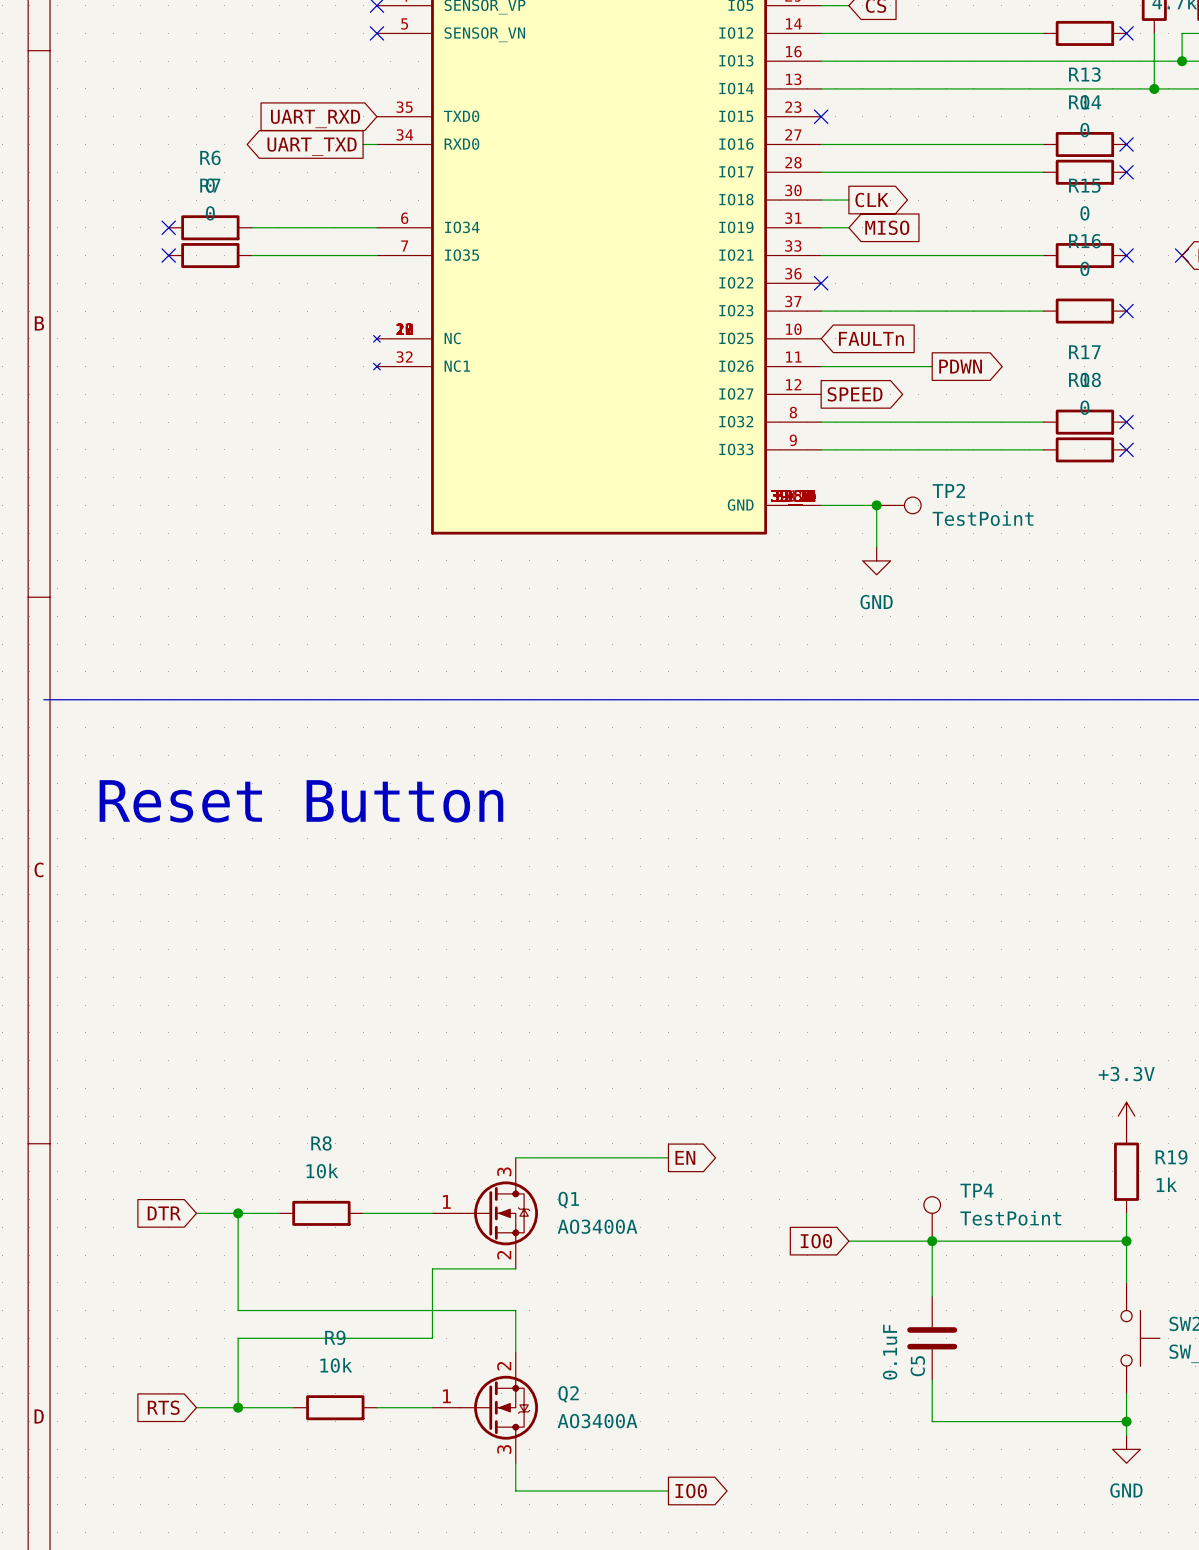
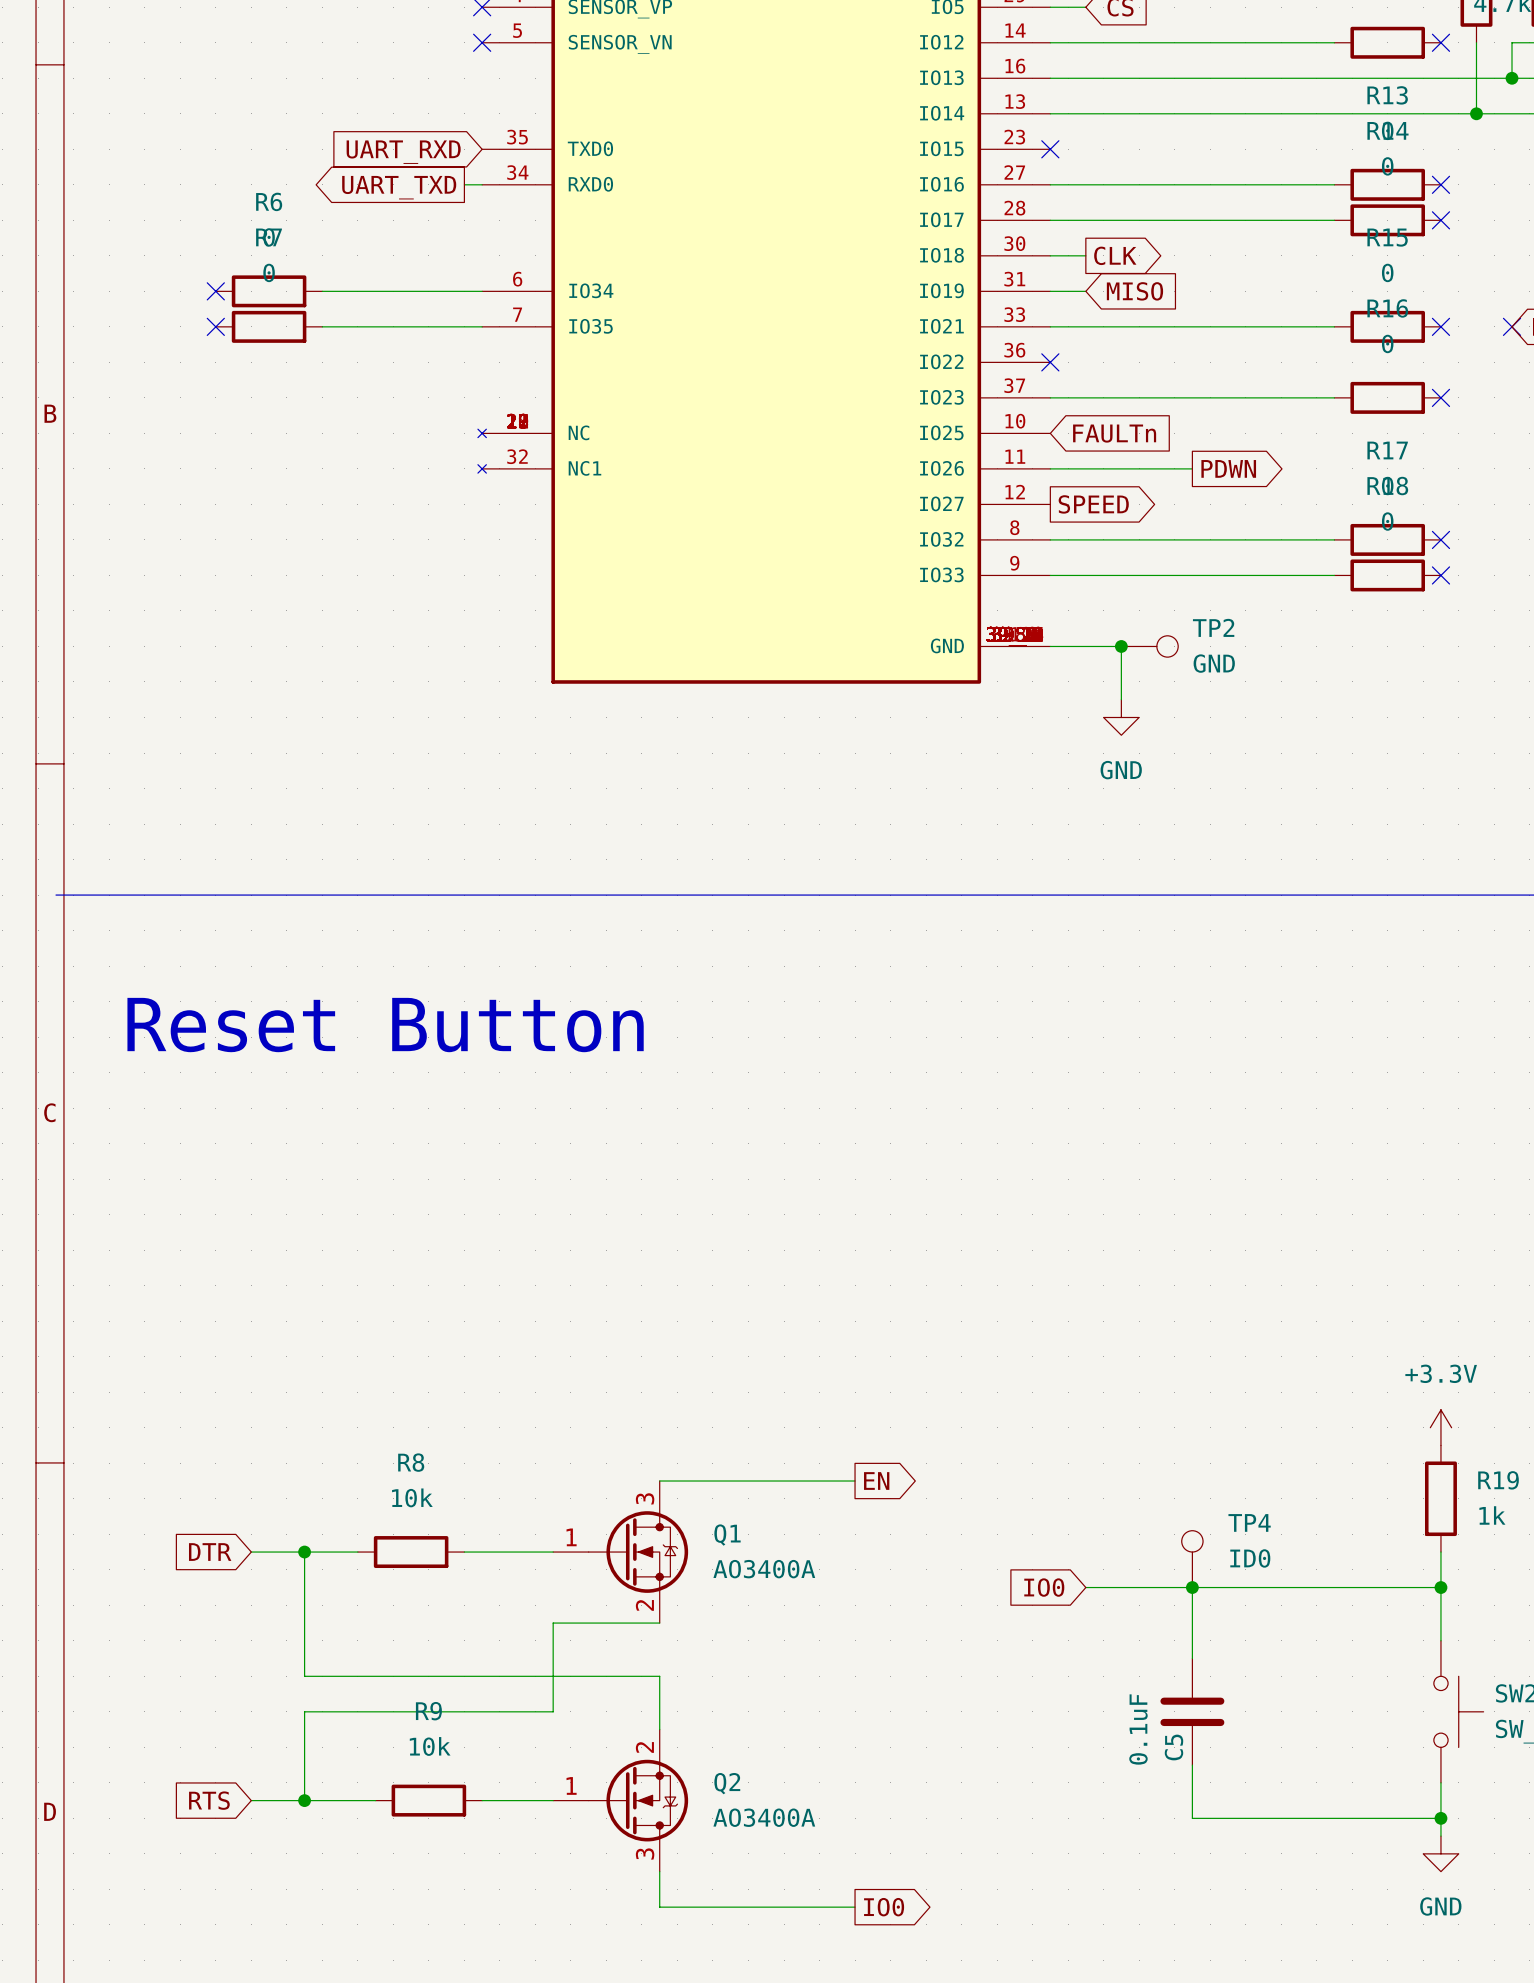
TP2 value: TestPoint (983, 518) -> GND (1214, 663)
TP4 value: TestPoint (1010, 1218) -> ID0 (1250, 1558)

